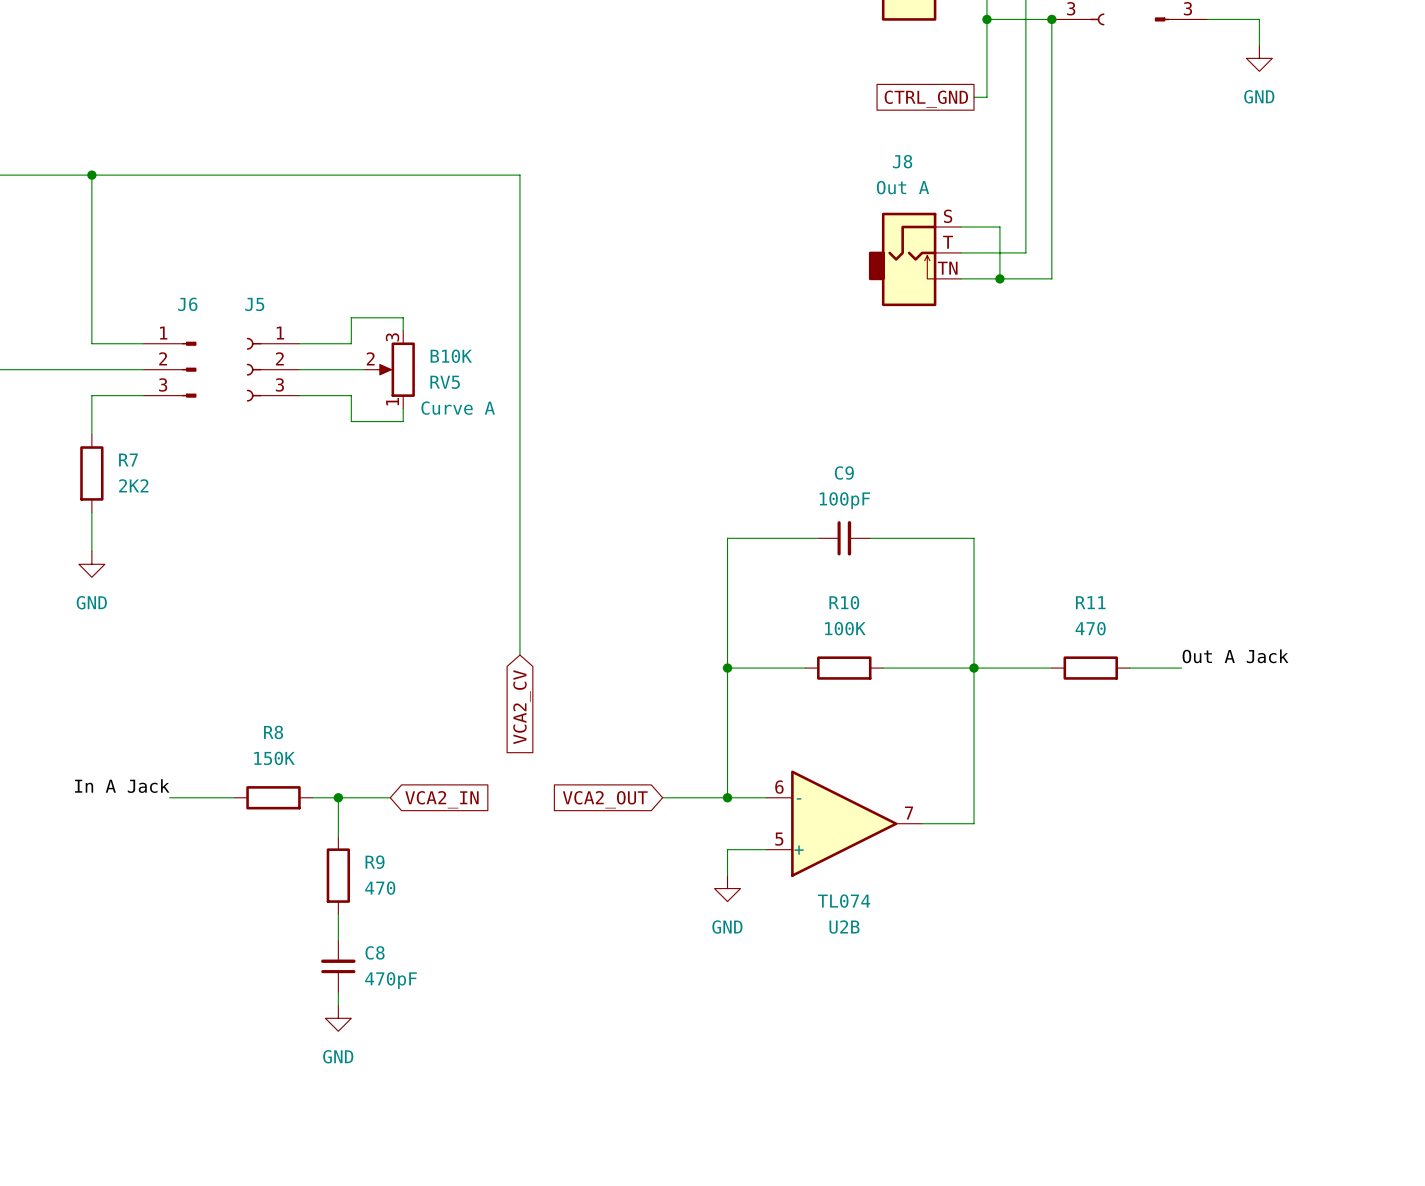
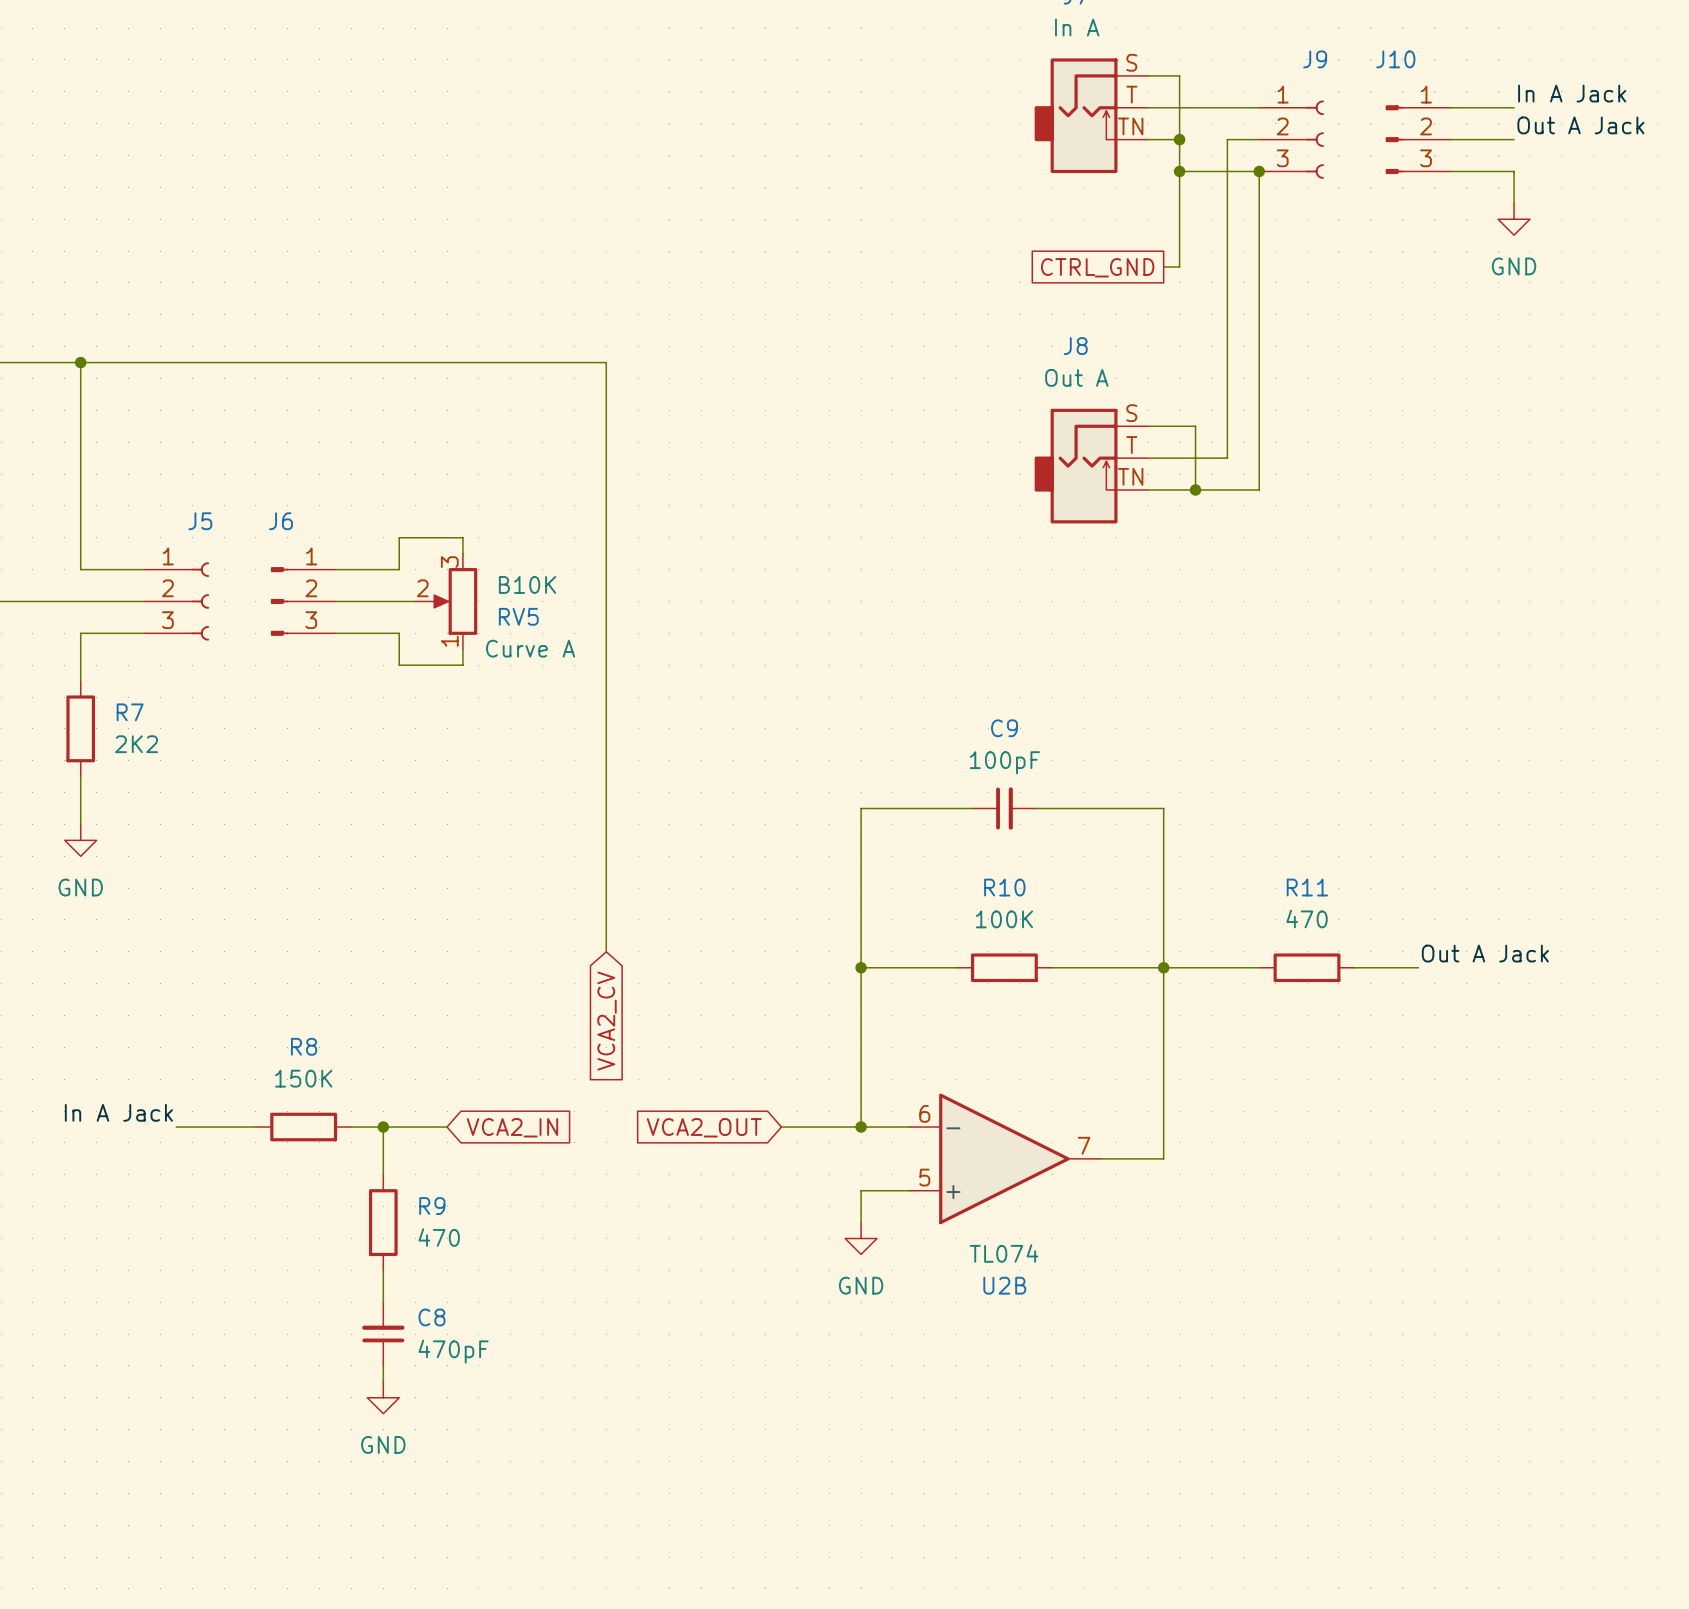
J6 position: (170, 369) -> (303, 601)
J6 flip: as is (189, 369) -> left-right (279, 601)
J5 flip: as is (254, 369) -> left-right (200, 601)
J5 position: (273, 369) -> (176, 601)

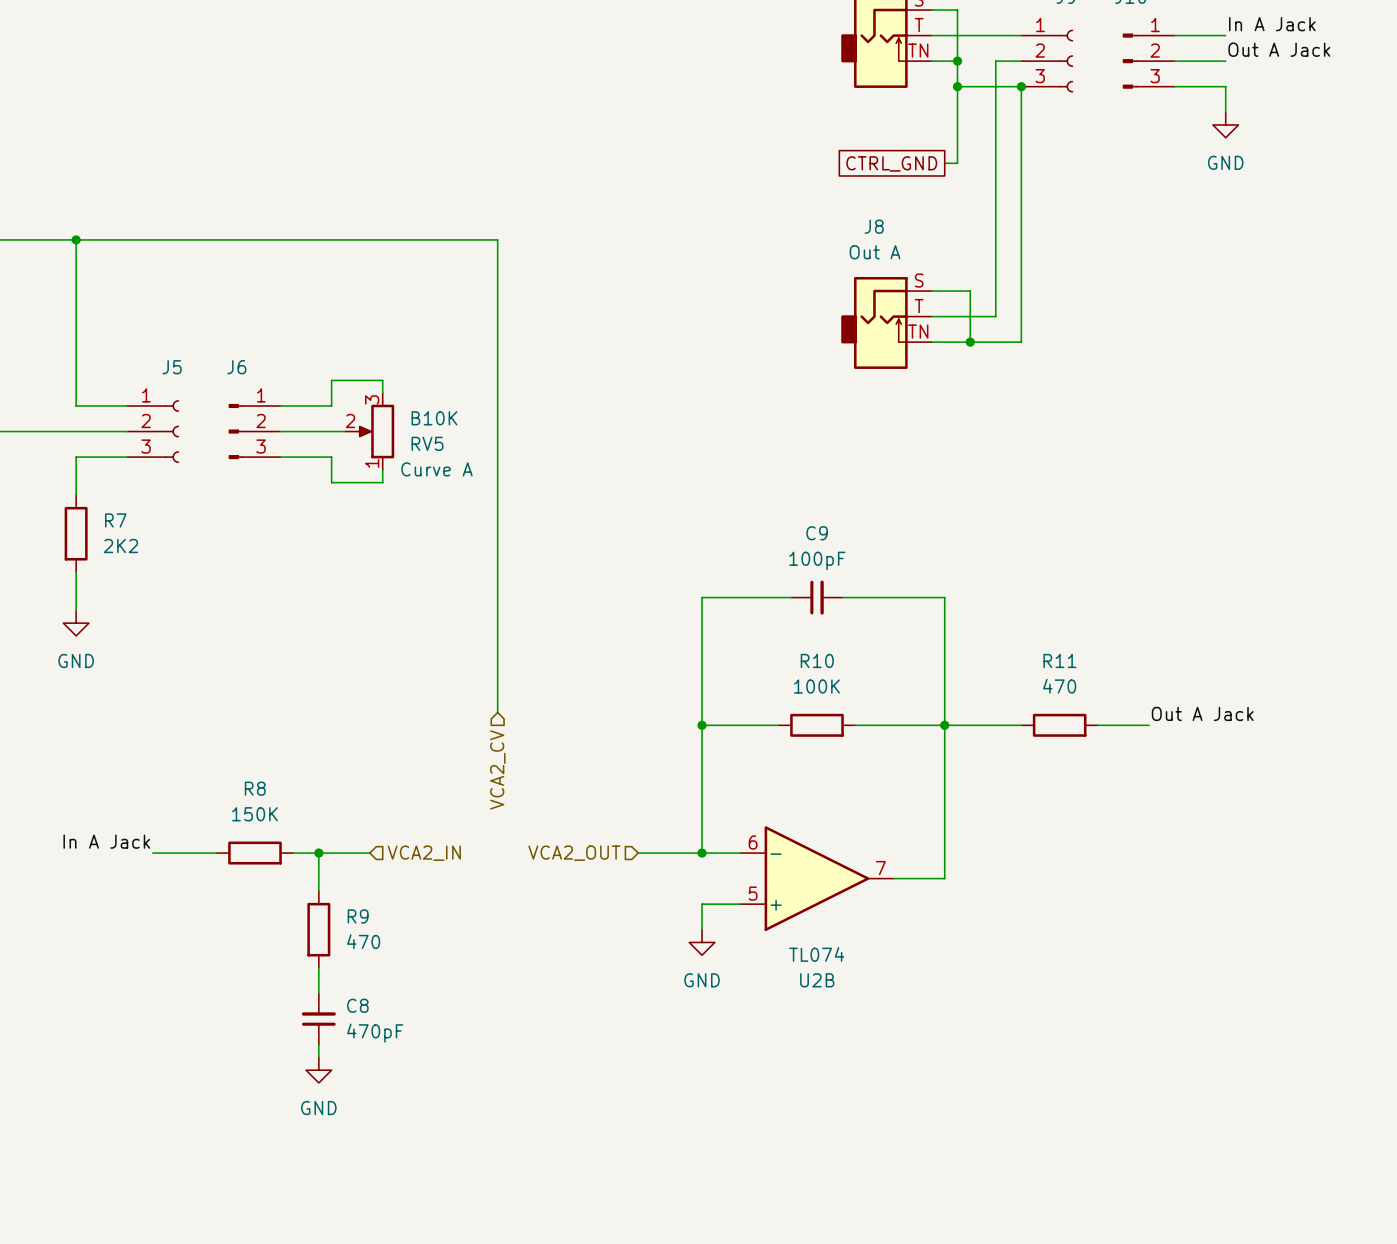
global label: VCA2_CV (607, 1021) -> none
hierarchical label: none -> VCA2_CV (497, 769)
global label: VCA2_IN (512, 1127) -> none
hierarchical label: none -> VCA2_IN (424, 853)
hierarchical label: none -> VCA2_OUT (574, 853)
global label: VCA2_OUT (704, 1127) -> none

